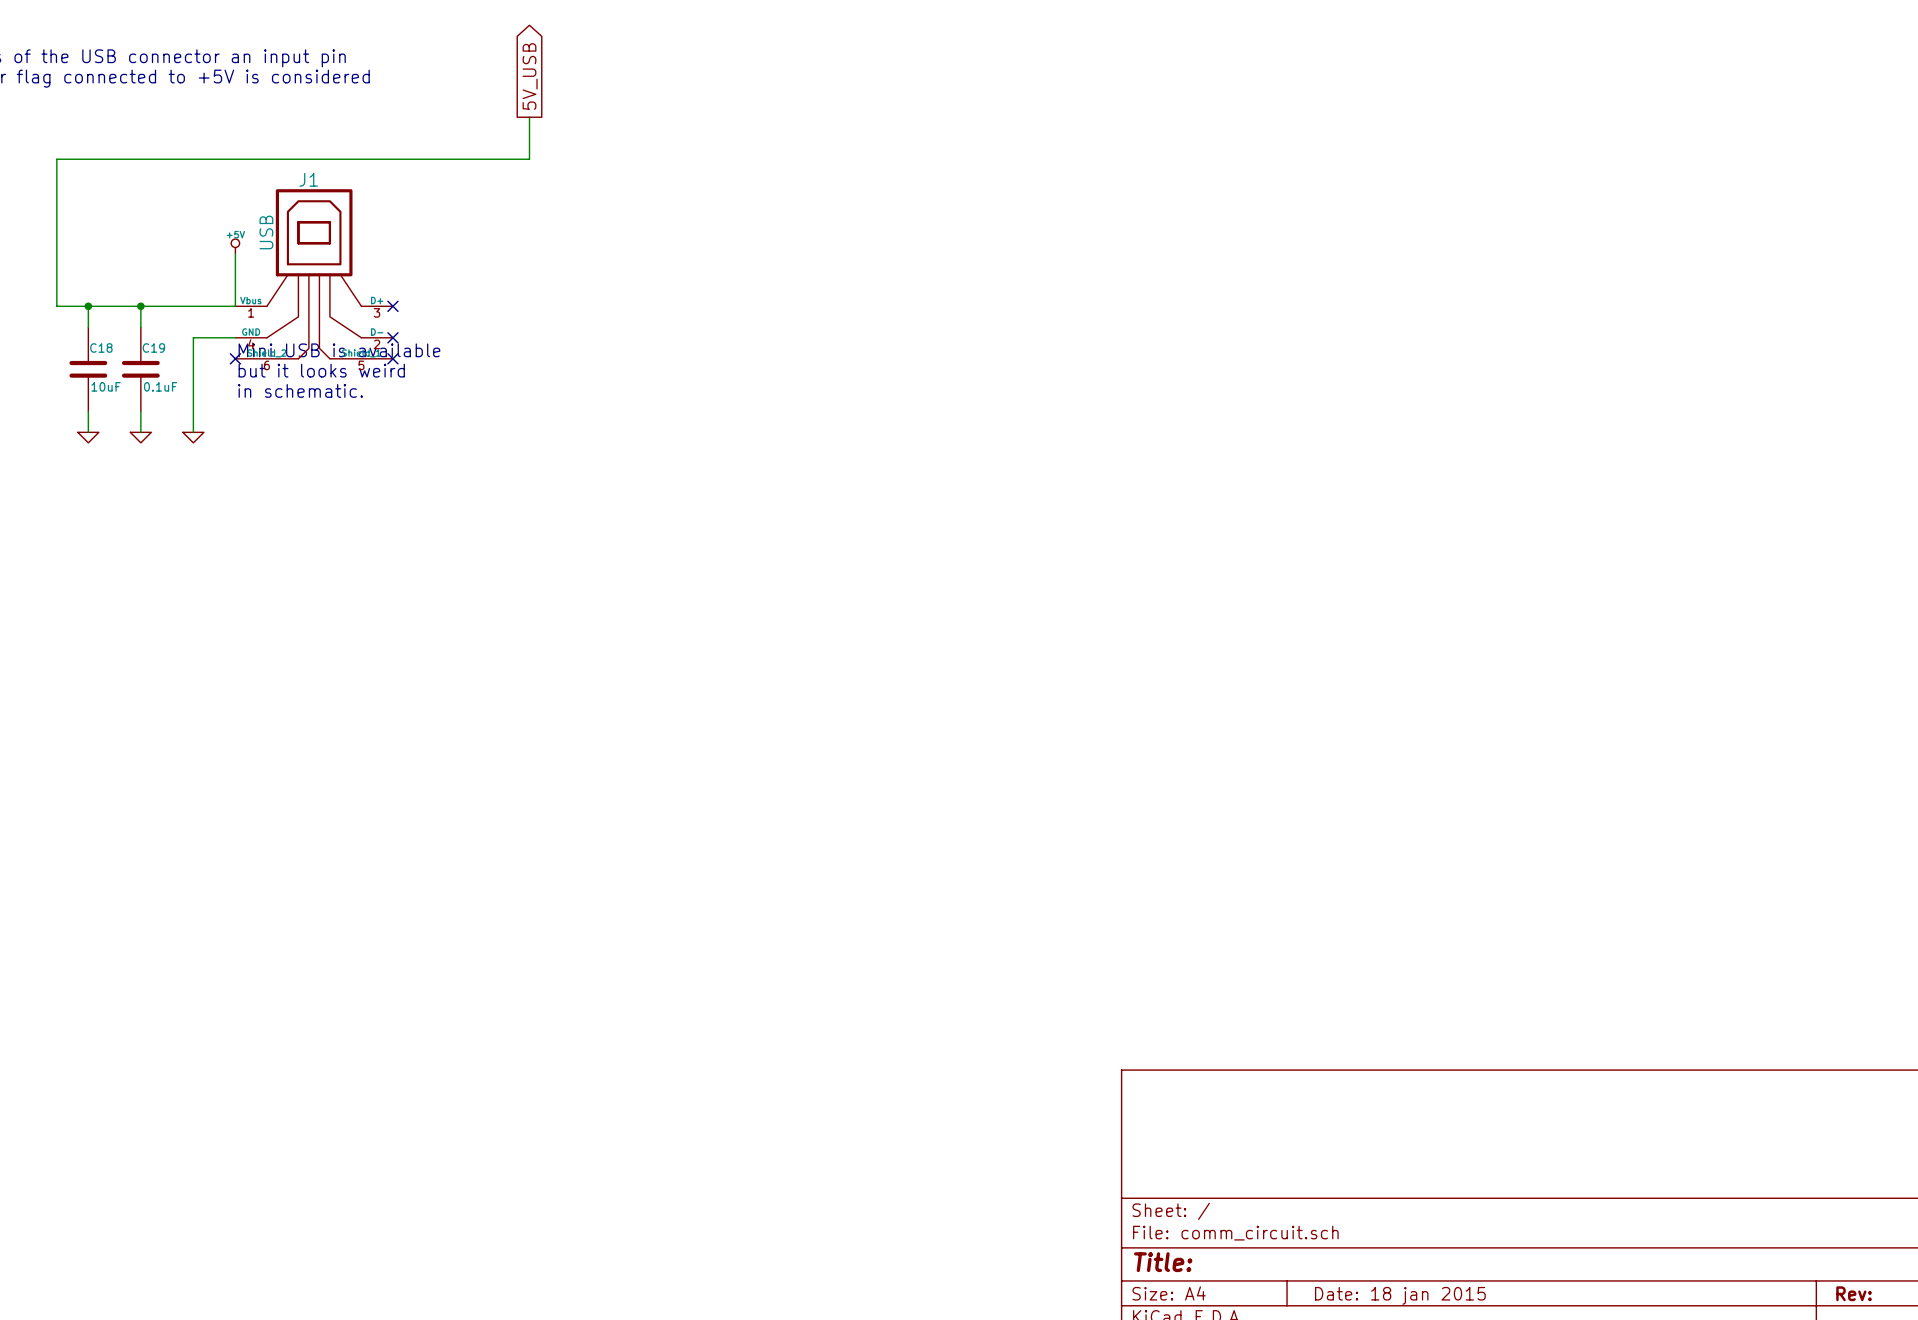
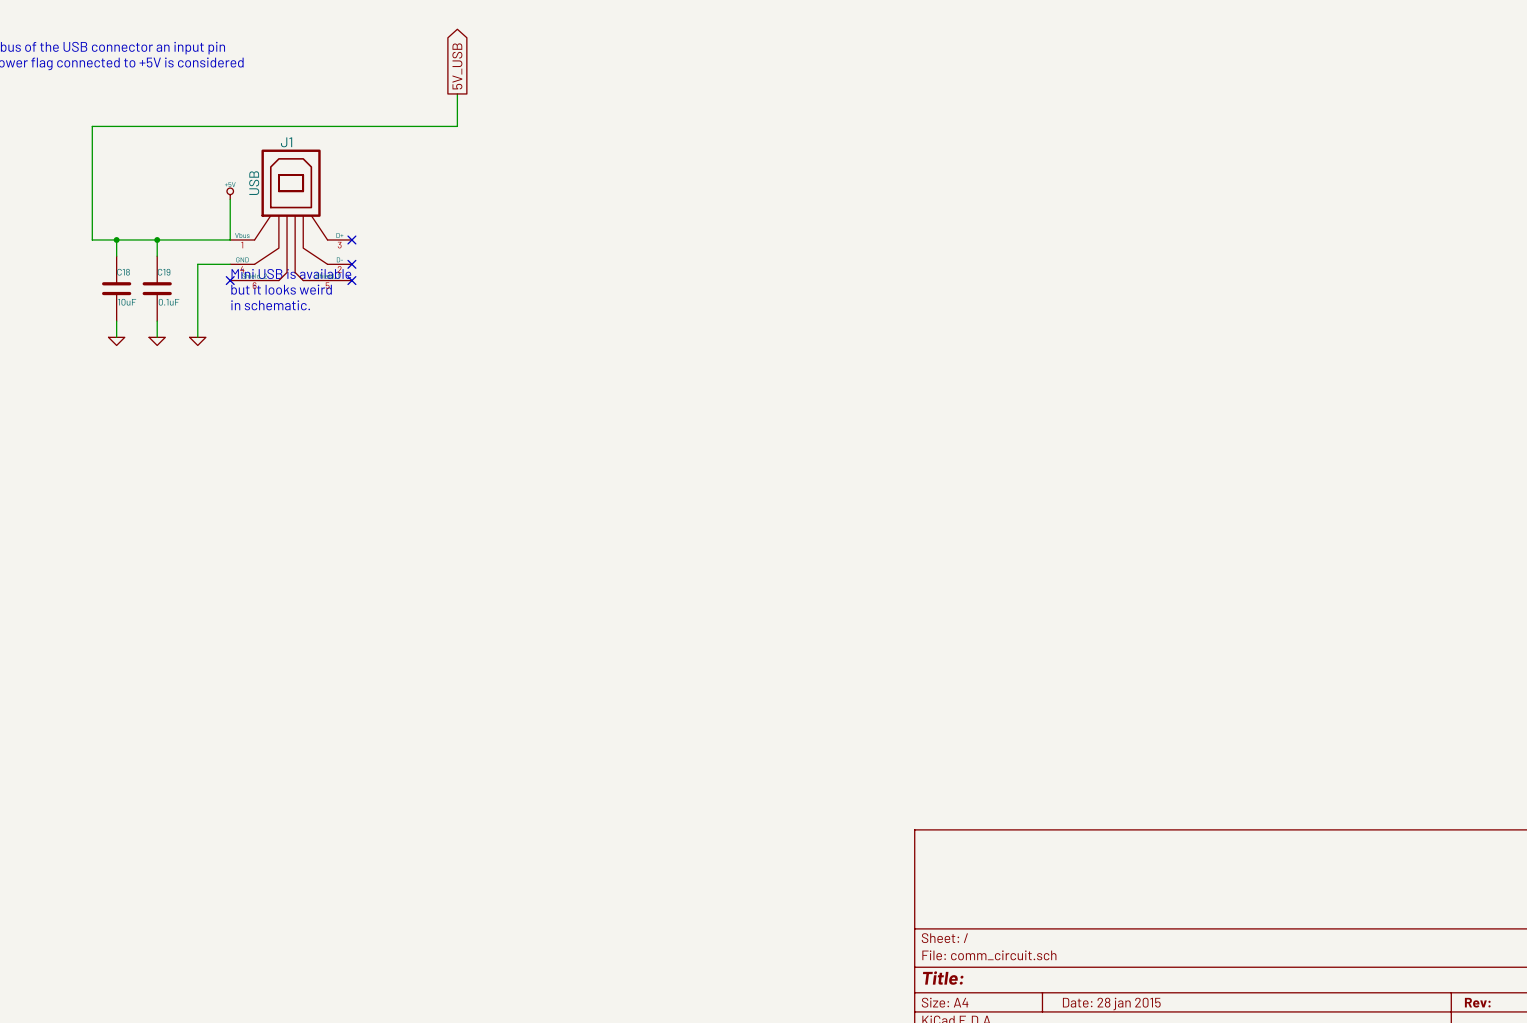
title block: Date: 18 jan 2015 (1400, 1295) -> Date: 28 jan 2015 (1111, 1004)

